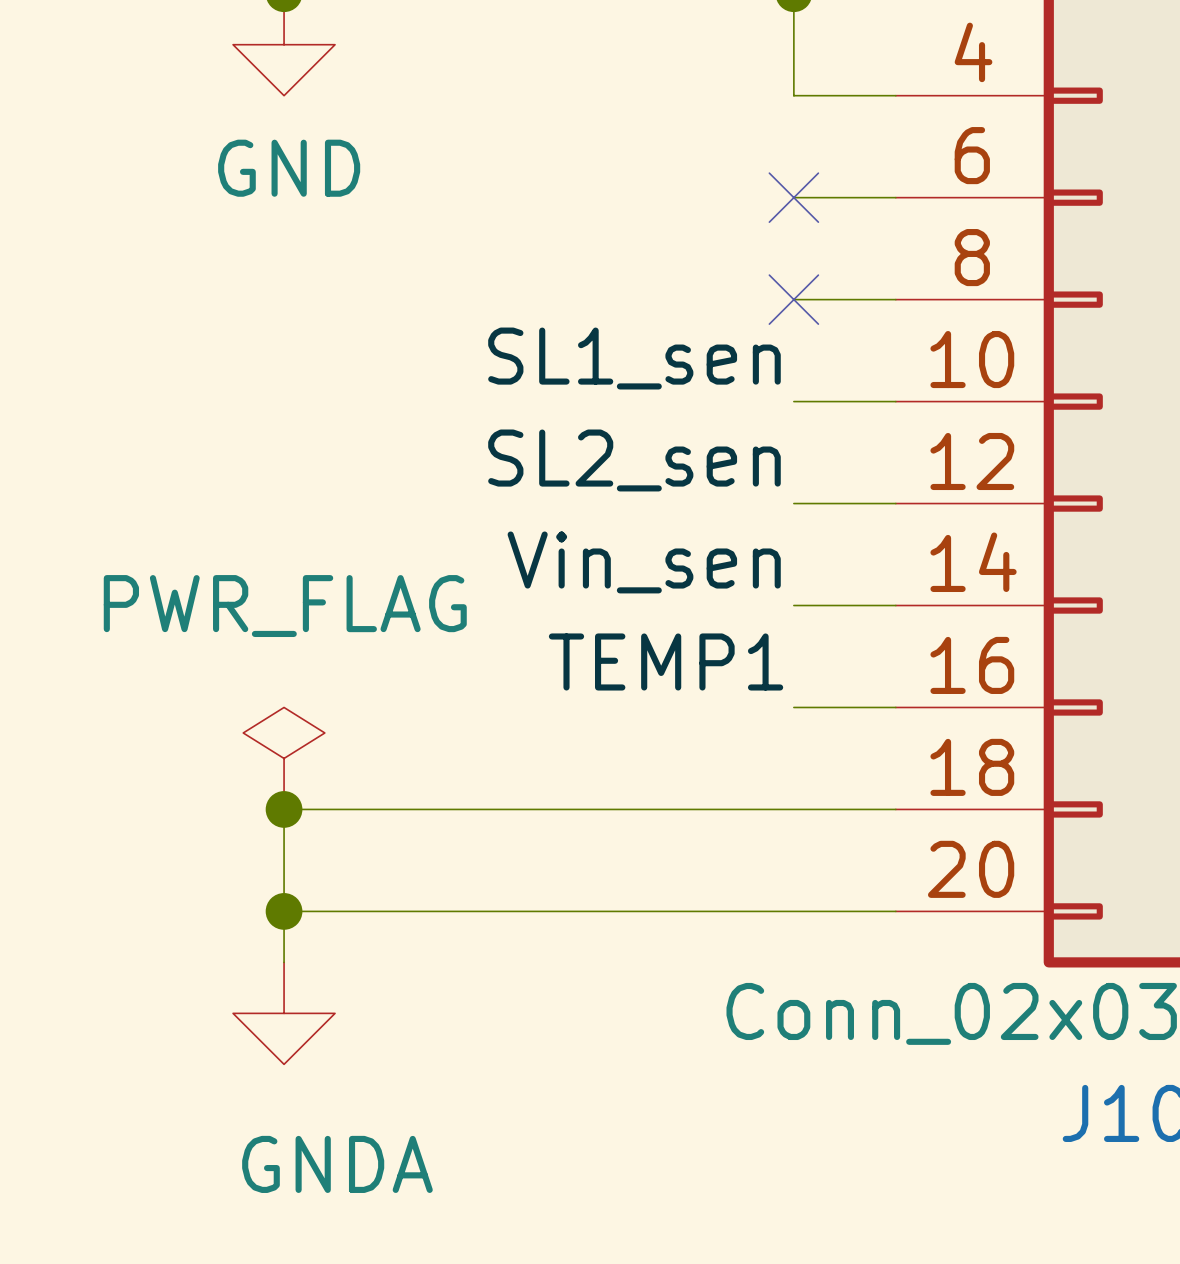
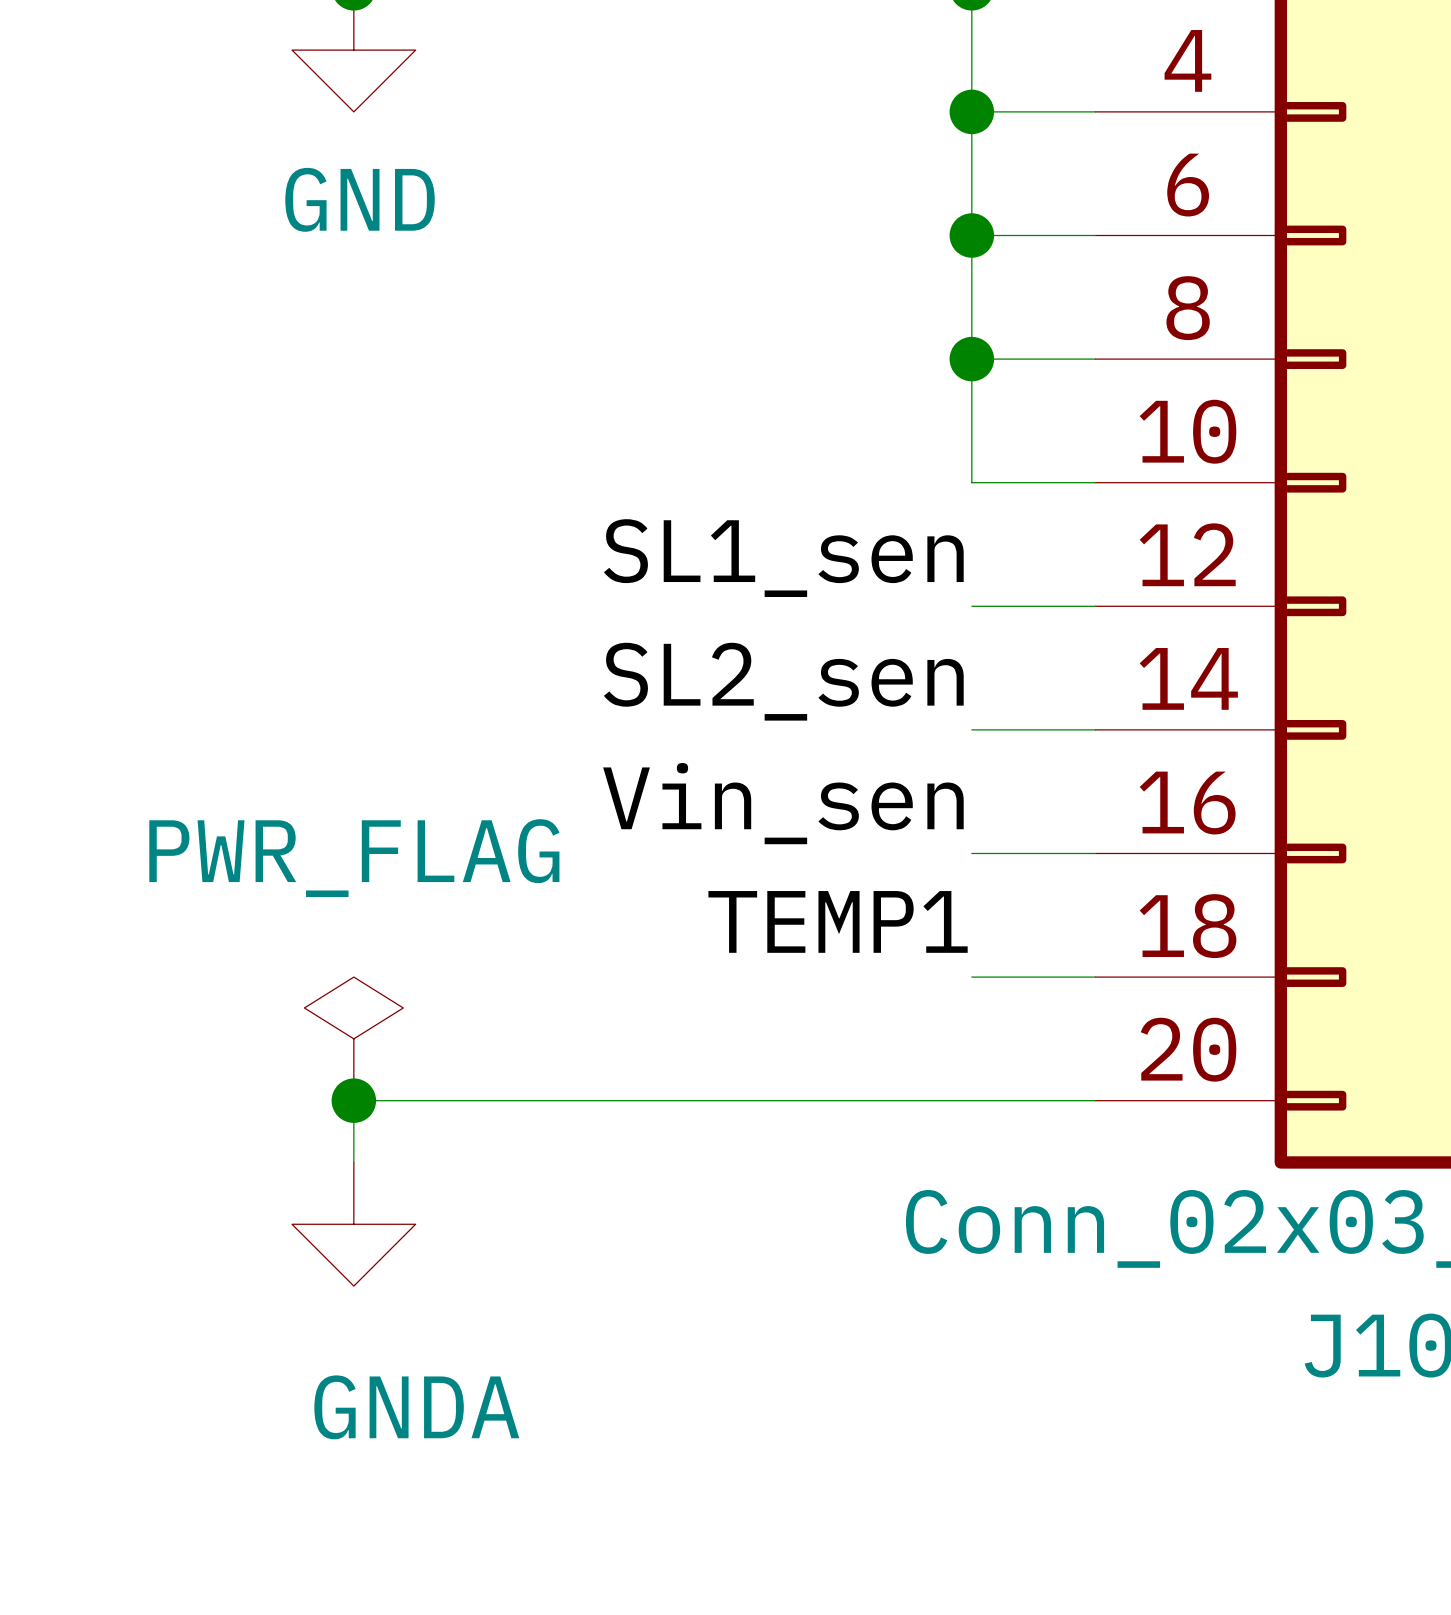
wire: none -> (971, 111) (971, 482)
junction: none -> (971, 111)
no-connect mark: (793, 197) -> none
junction: none -> (971, 235)
no-connect mark: (793, 299) -> none
junction: none -> (971, 359)
label: SL1_sen (634, 358) -> none
label: SL2_sen (634, 460) -> SL1_sen (783, 558)
label: Vin_sen (644, 562) -> SL2_sen (783, 681)
label: TEMP1 (666, 661) -> Vin_sen (783, 803)
power symbol position: PWR_FLAG (284, 758) -> PWR_FLAG (353, 1038)
label: none -> TEMP1 (838, 921)
junction: (284, 809) -> none
wire: (793, 809) (284, 809) (284, 911) -> none

